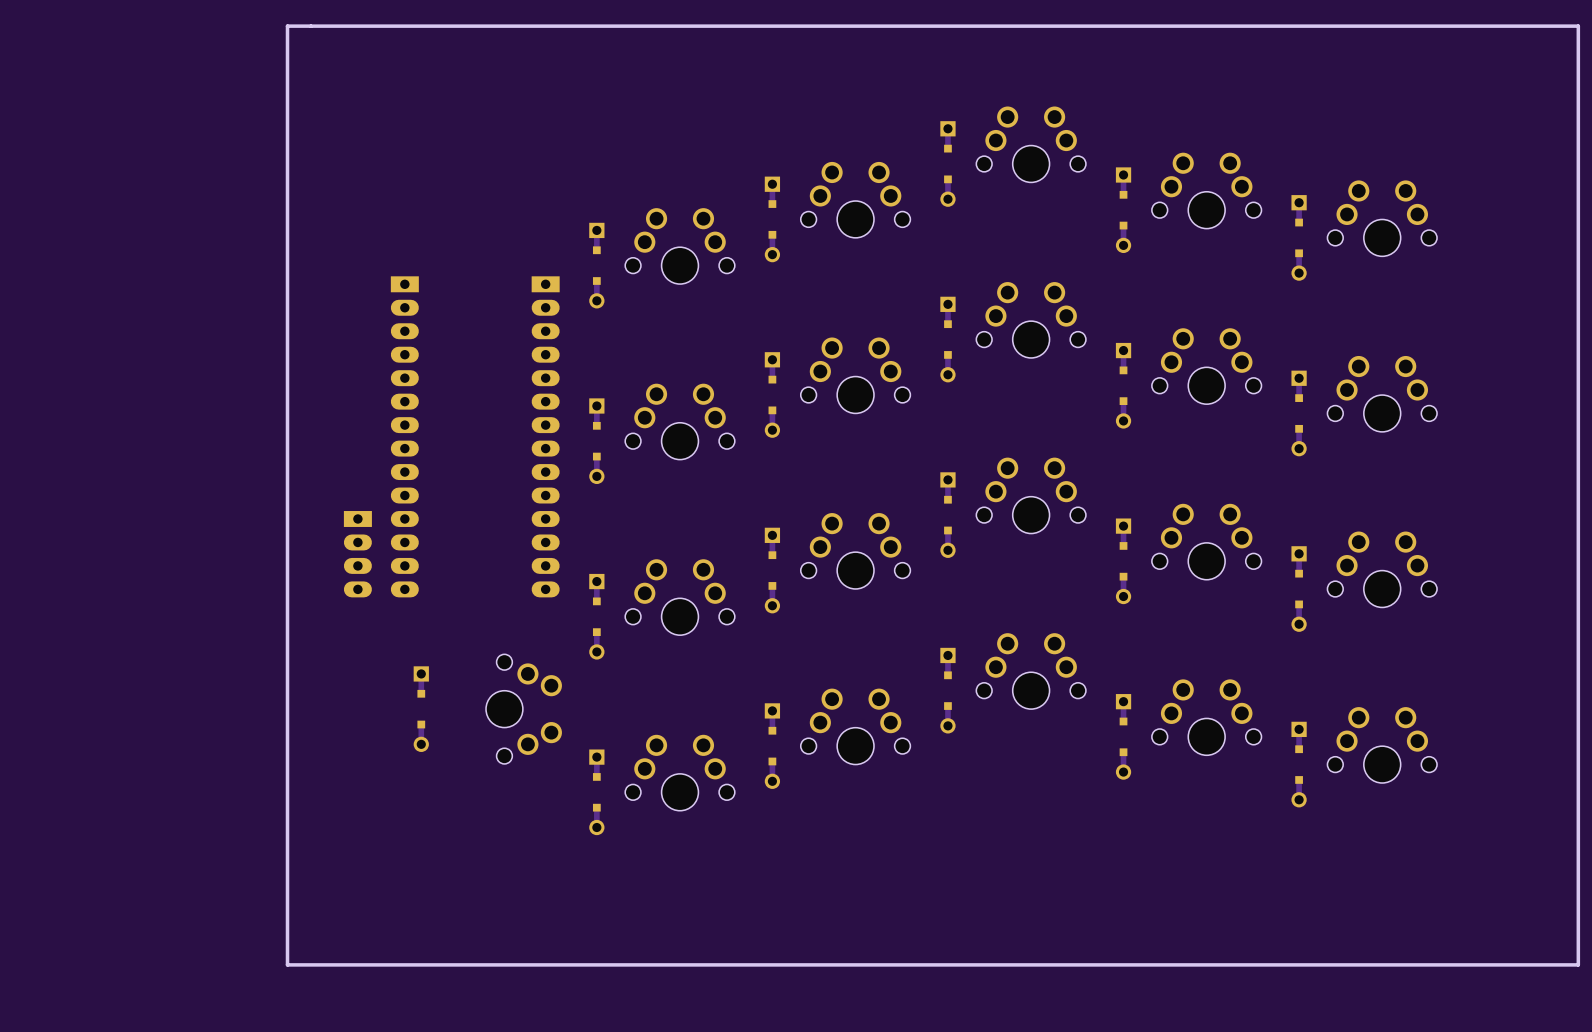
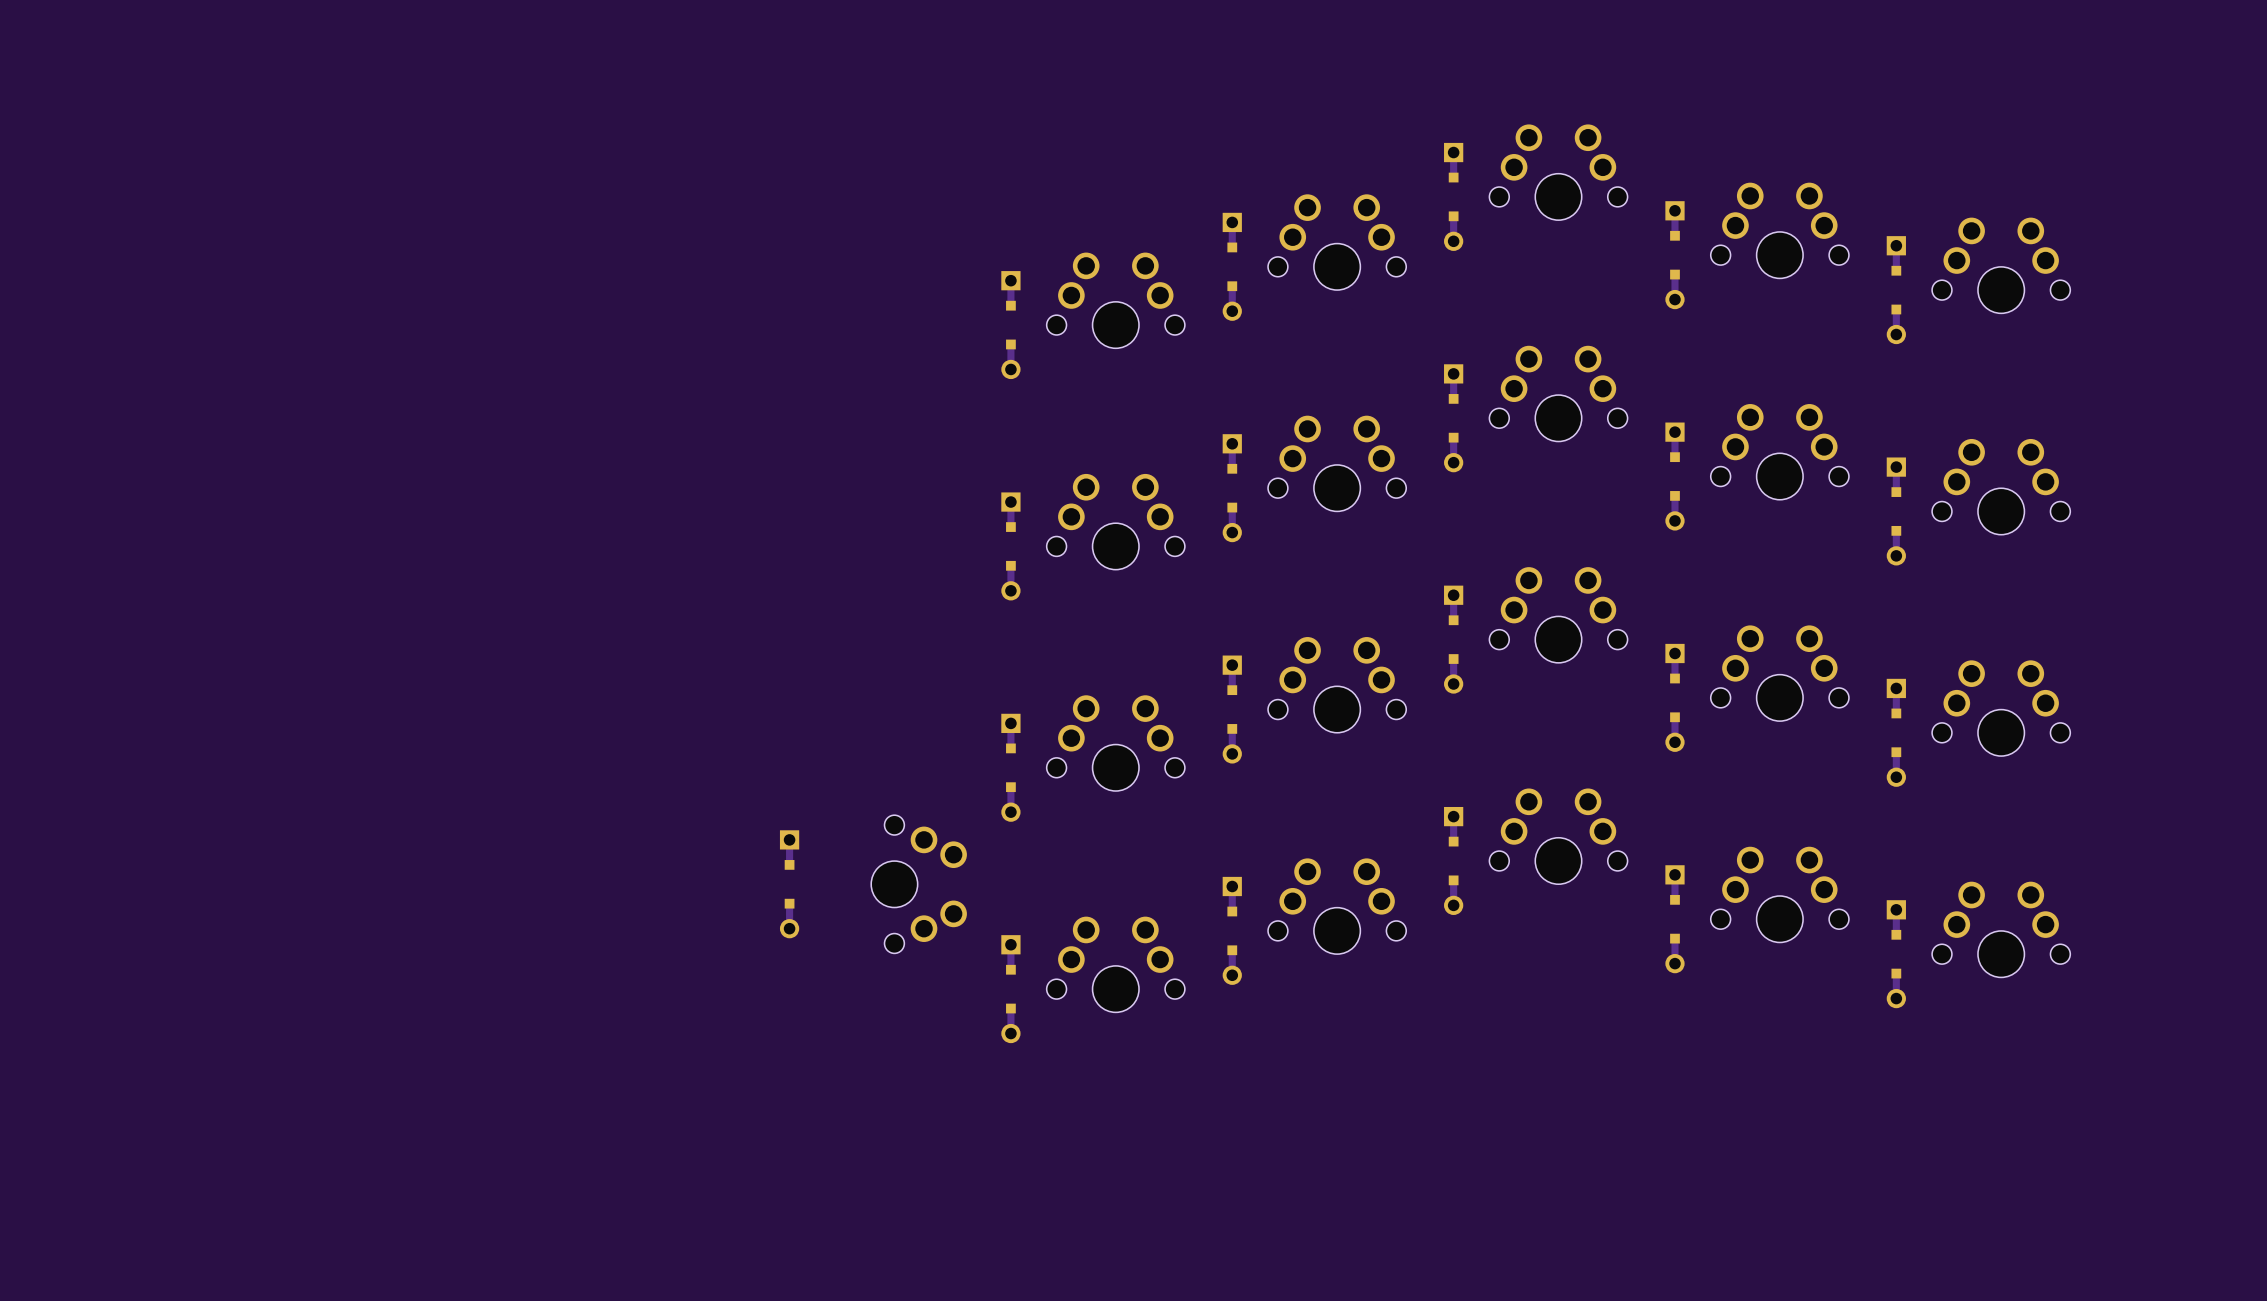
board edge: (1578, 26) (1578, 964) (287, 964) (287, 26) (1578, 26) -> none
part: (404, 436) -> none
part: (545, 436) -> none
part: (357, 554) -> none

